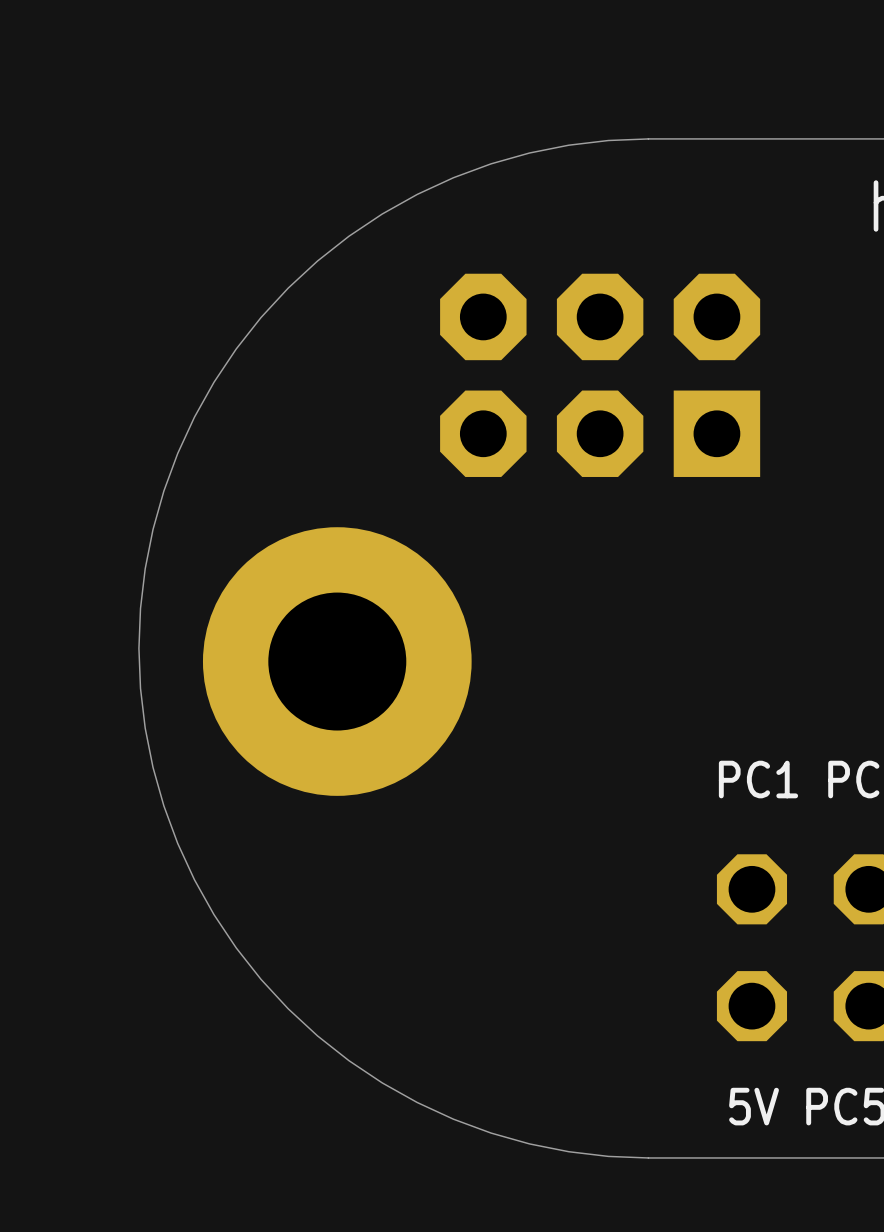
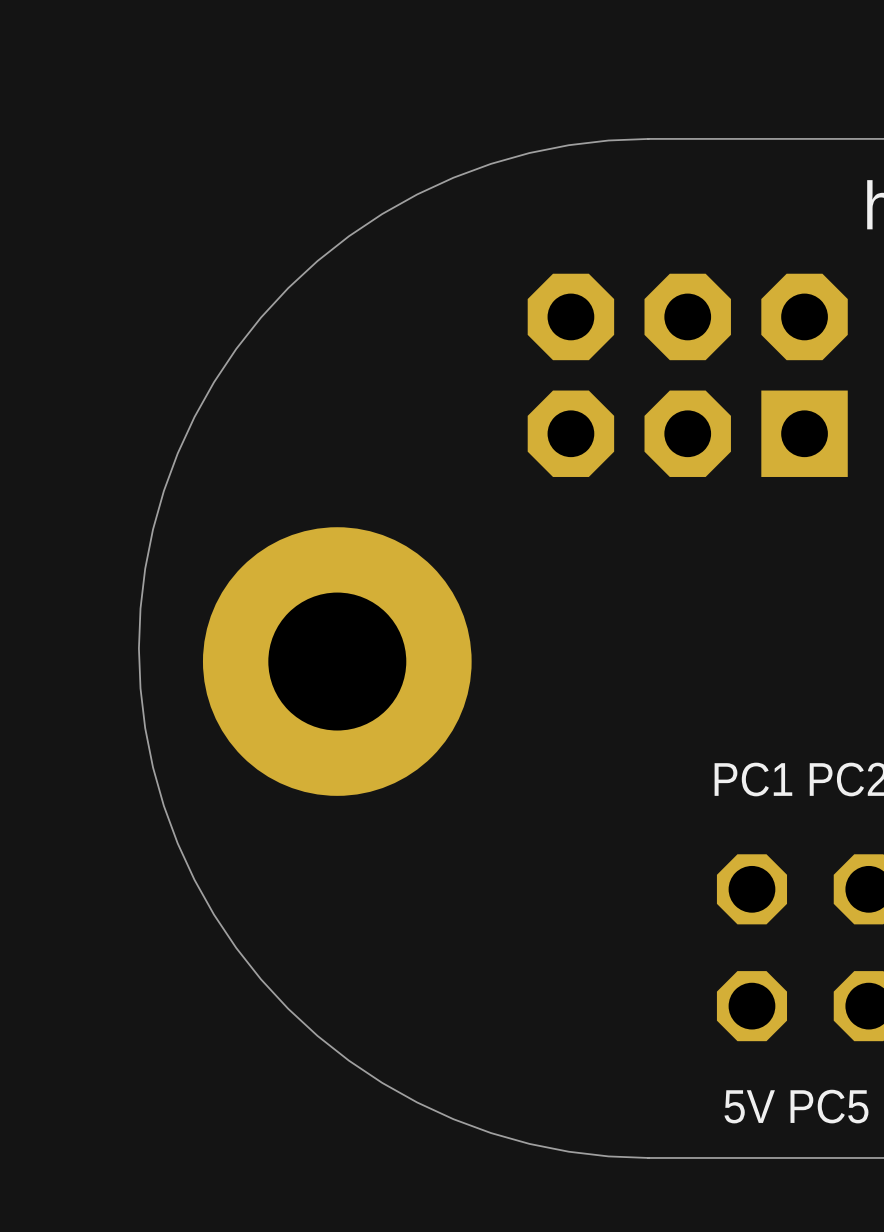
part position: (600, 375) -> (687, 375)

